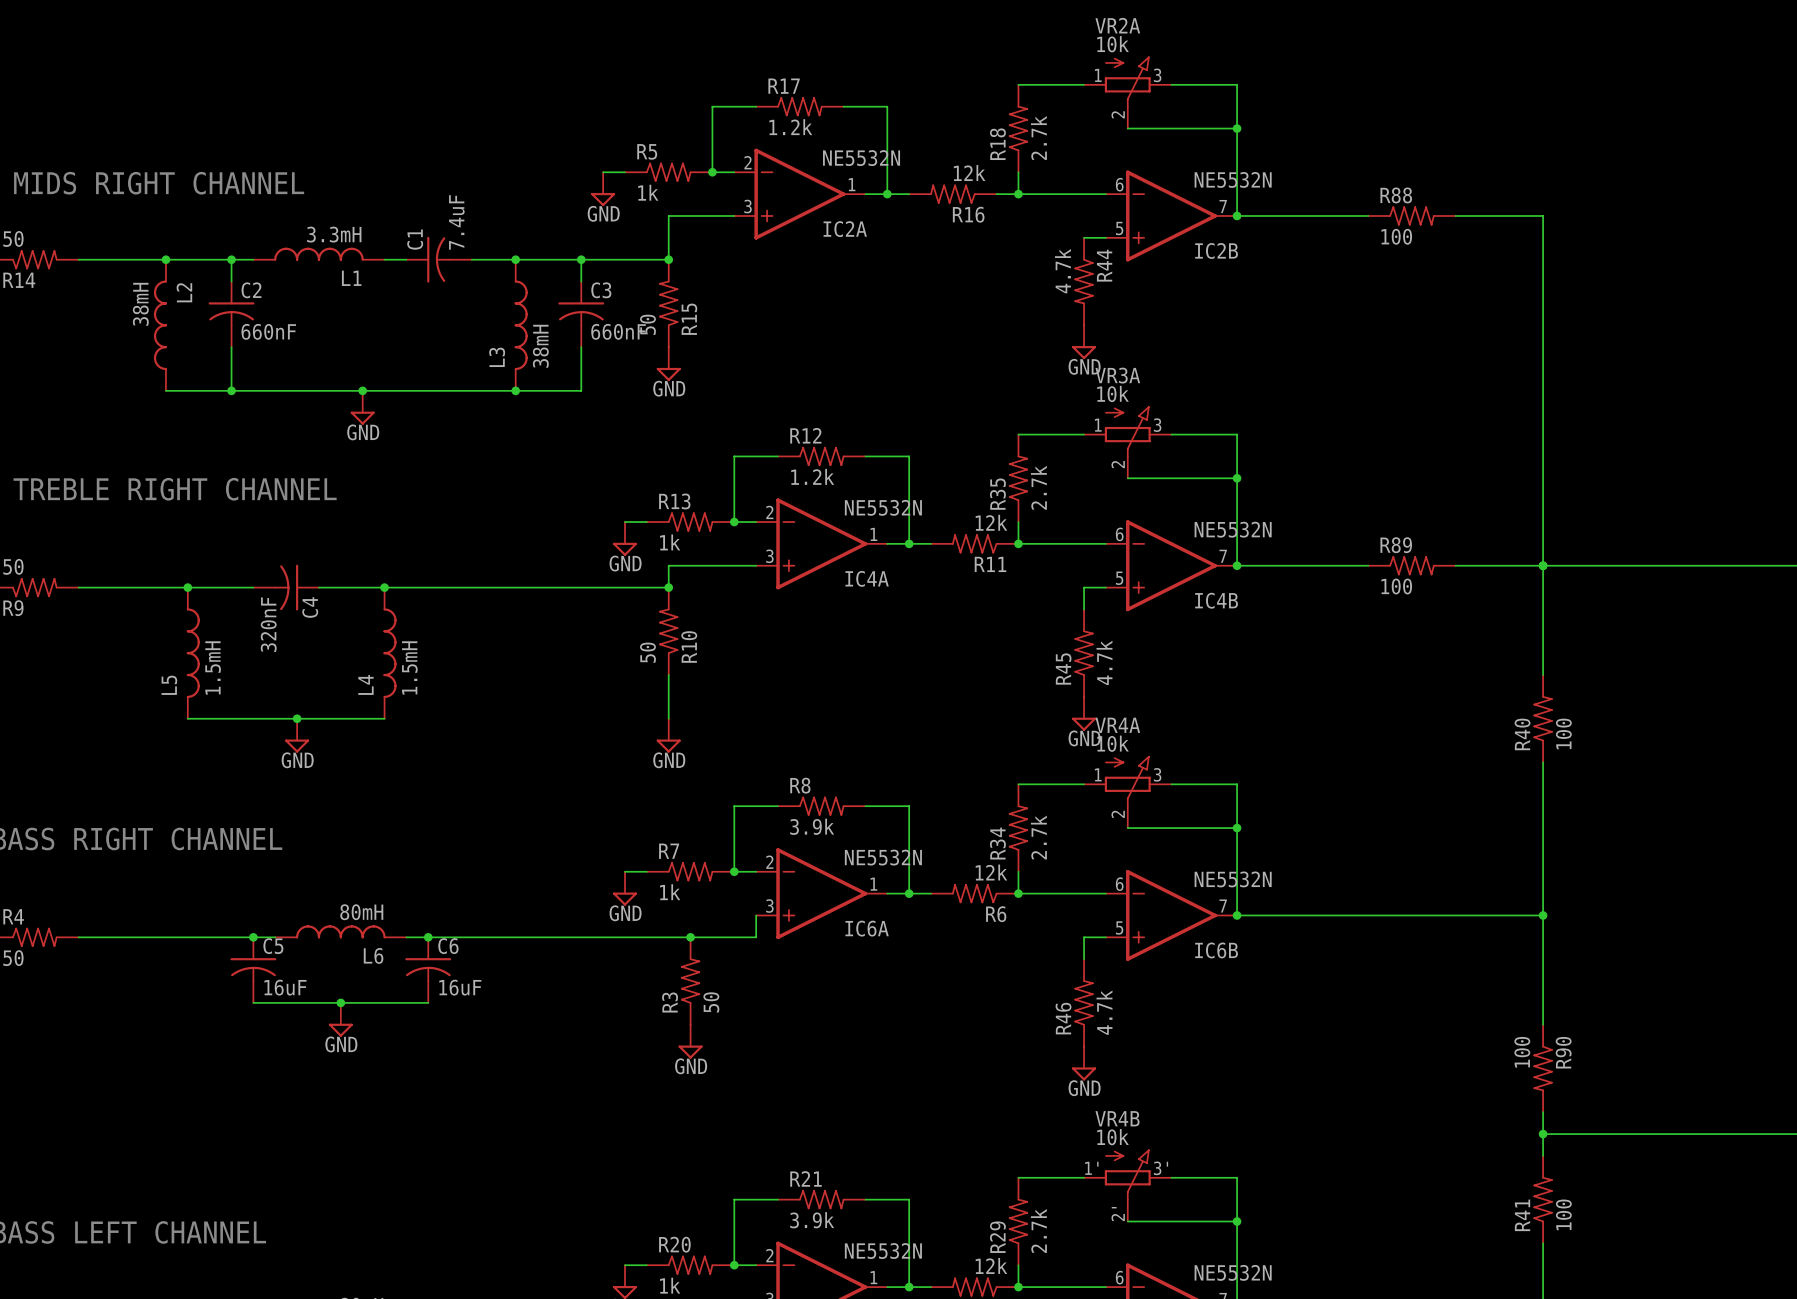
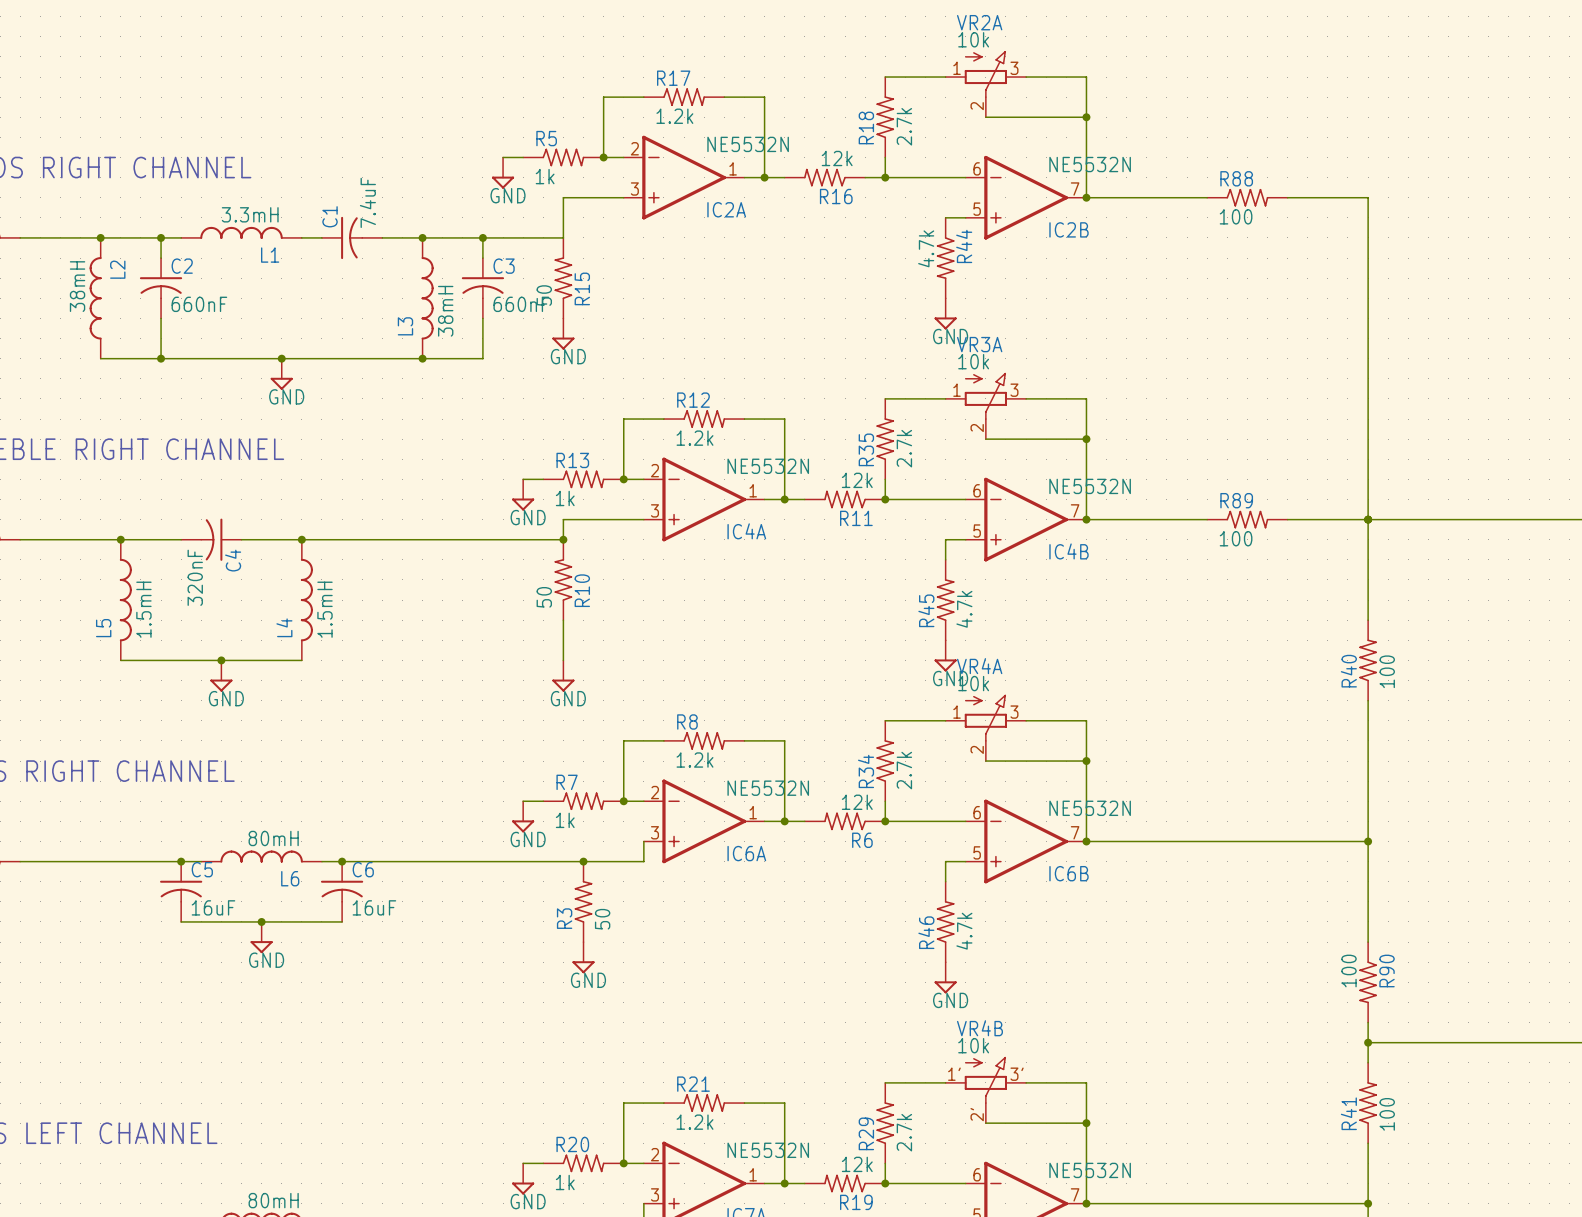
junction: (668, 259) -> none
R8 value: 3.9k (812, 826) -> 1.2k (695, 760)
R21 value: 3.9k (812, 1220) -> 1.2k (695, 1122)

